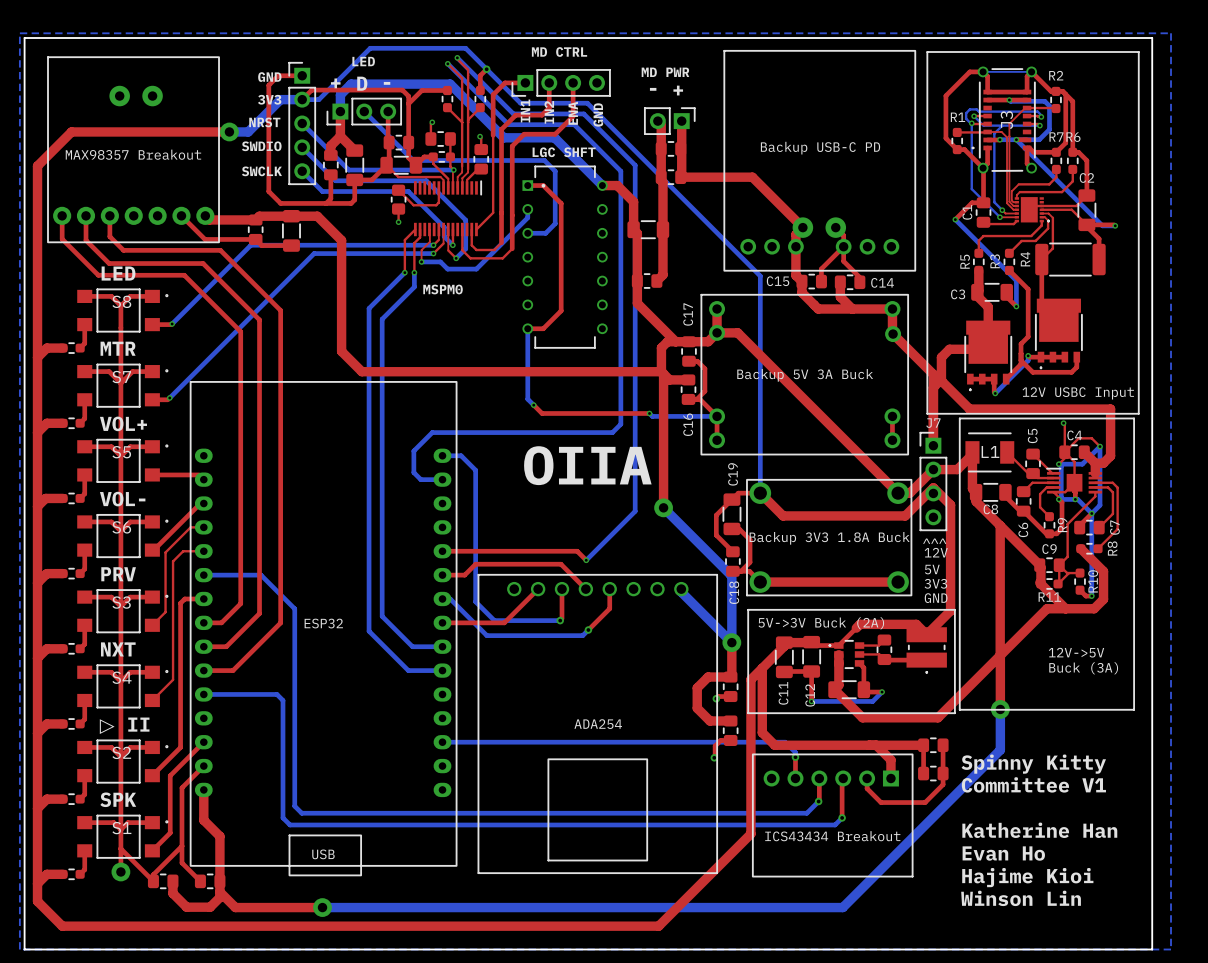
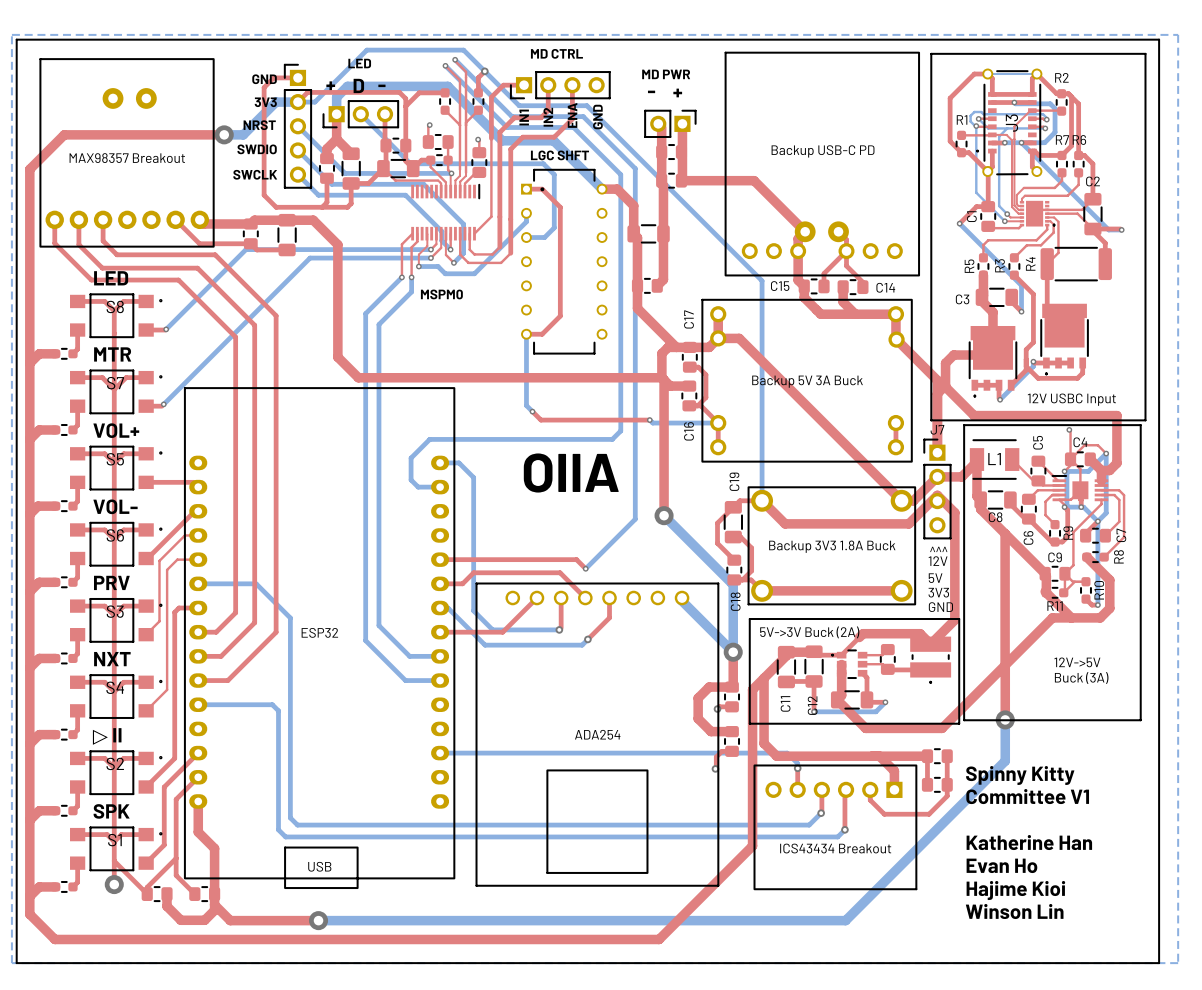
top track: (438, 187) (438, 202) (436, 205) (413, 205) (398, 190) -> none
part: (398, 199) -> none
top track: (398, 209) (398, 222) -> none
via: (398, 222) -> none

